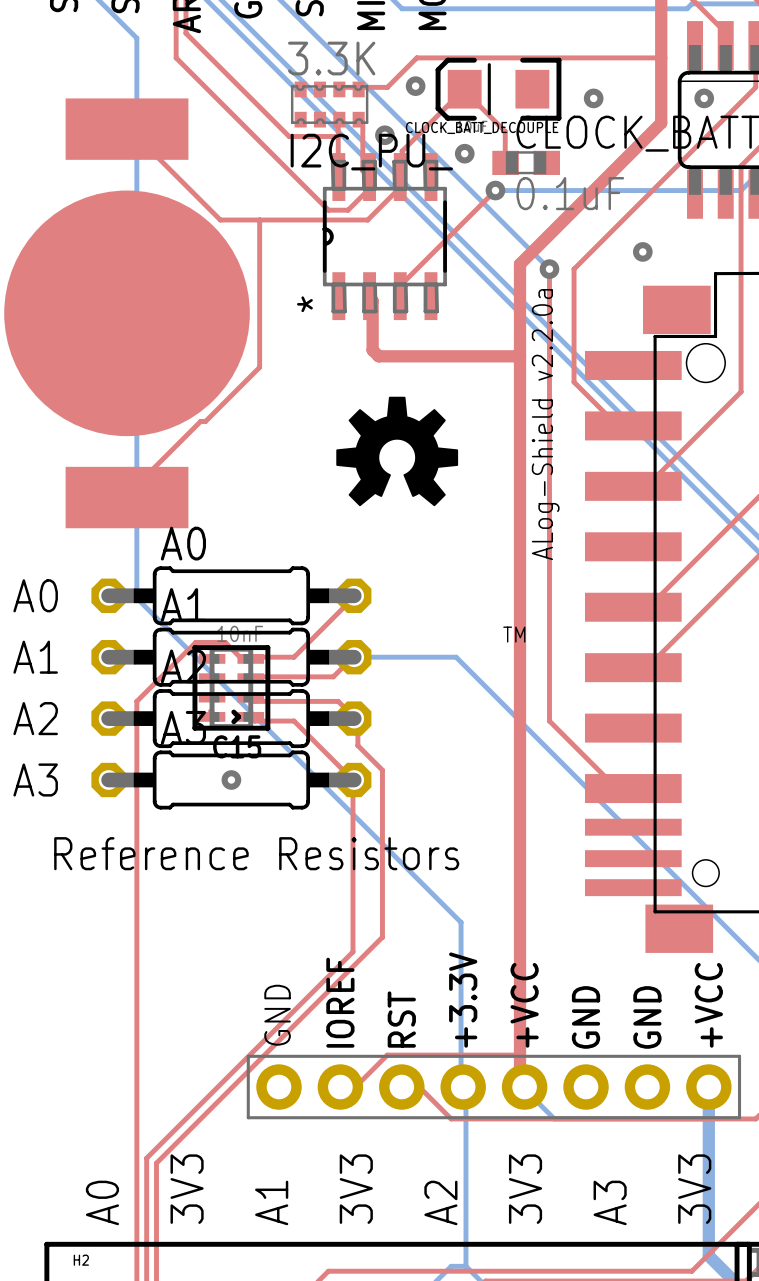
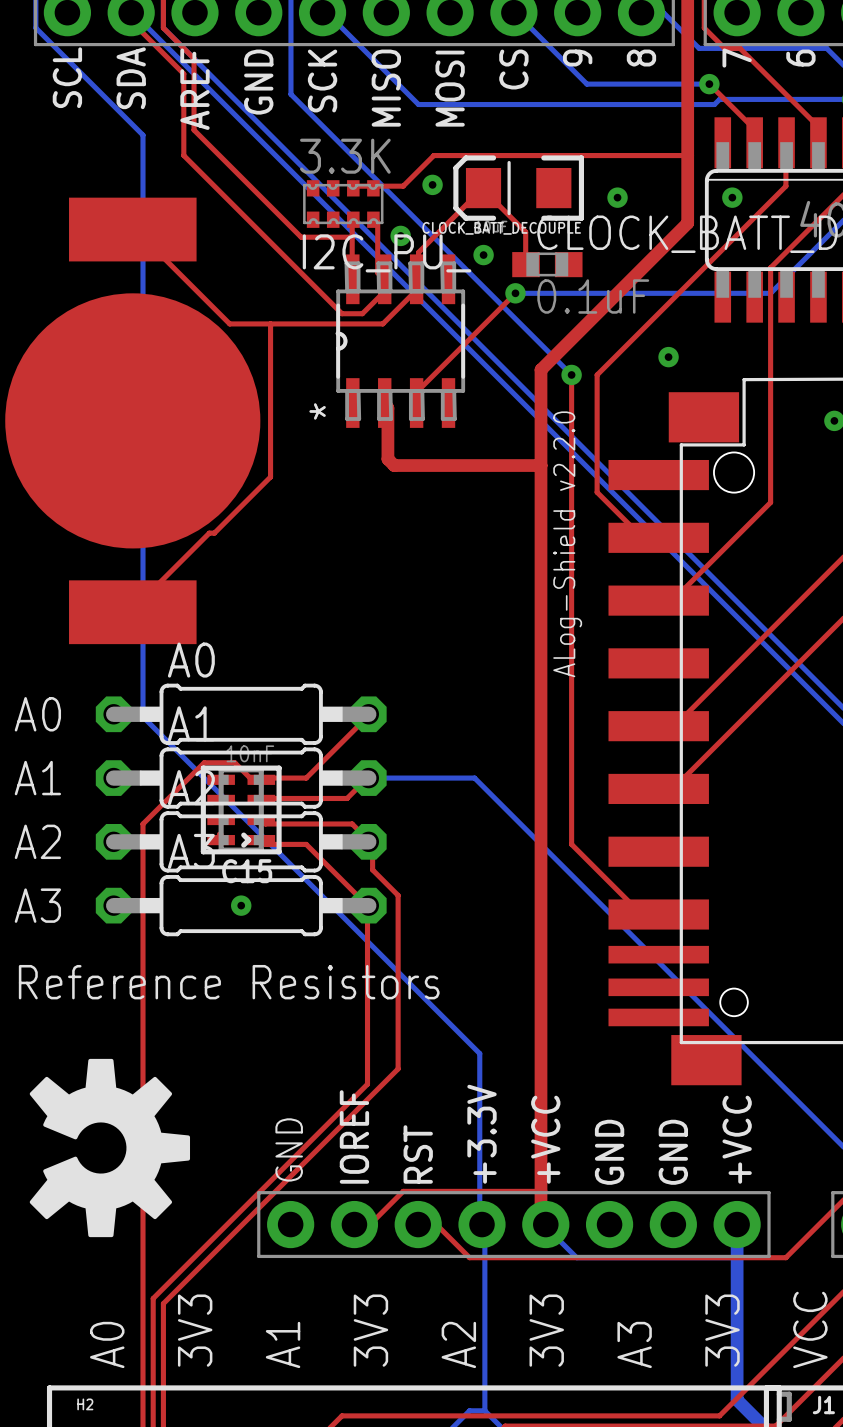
drawing: [336, 396, 459, 507] -> none
text: ALog-Shield v2.2.0a (545, 424) -> ALog-Shield v2.2.0 (567, 544)
text: TM (514, 634) -> none
text position: Reference Resistors (256, 853) -> Reference Resistors (229, 982)
drawing: none -> [29, 1058, 191, 1238]

